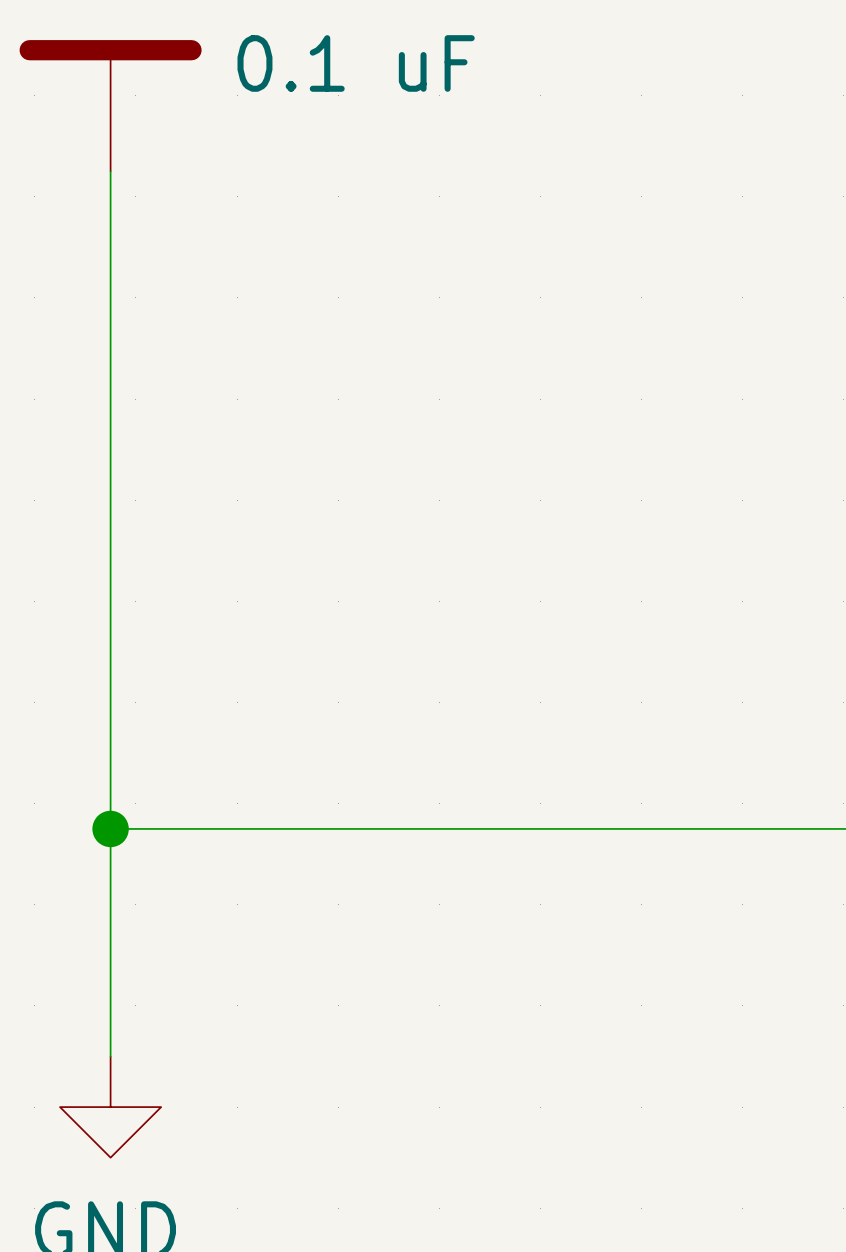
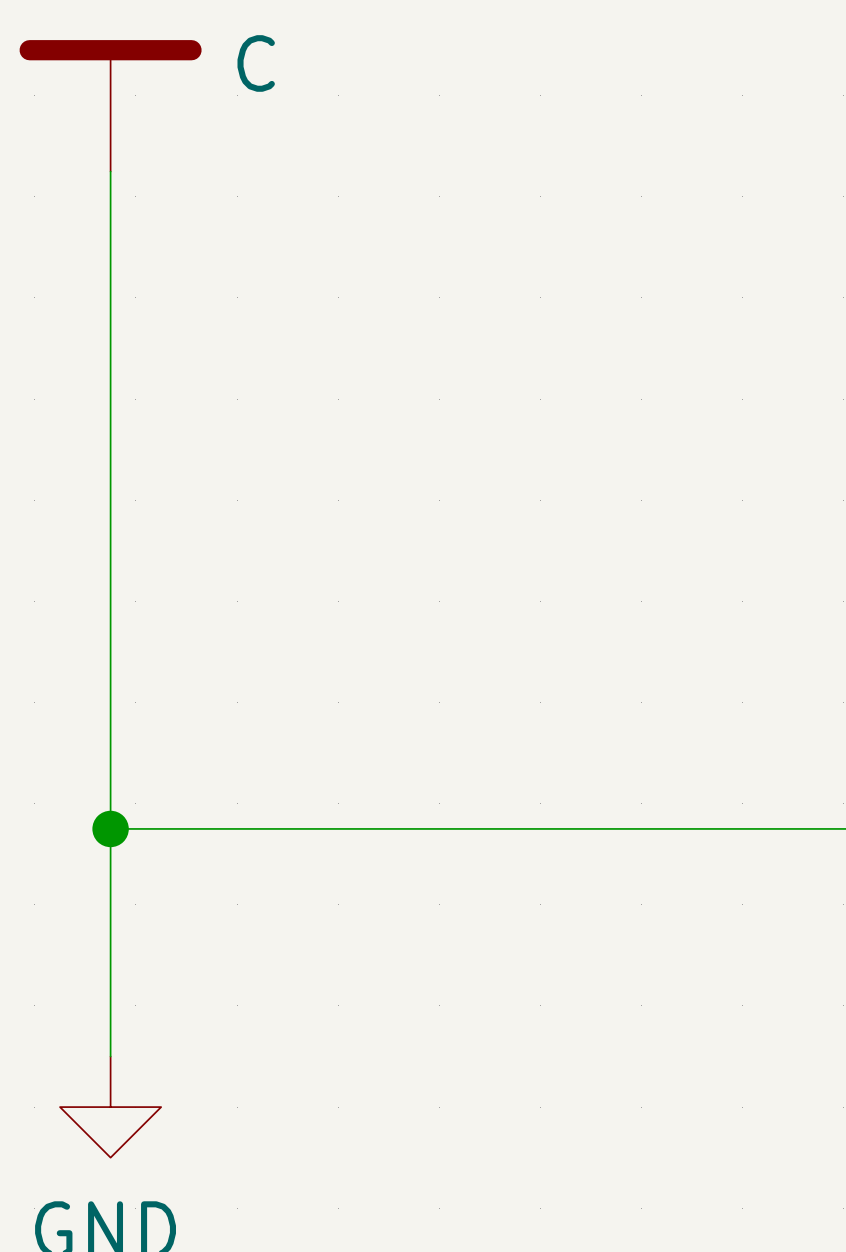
part value: 0.1 uF (356, 63) -> C (256, 63)

